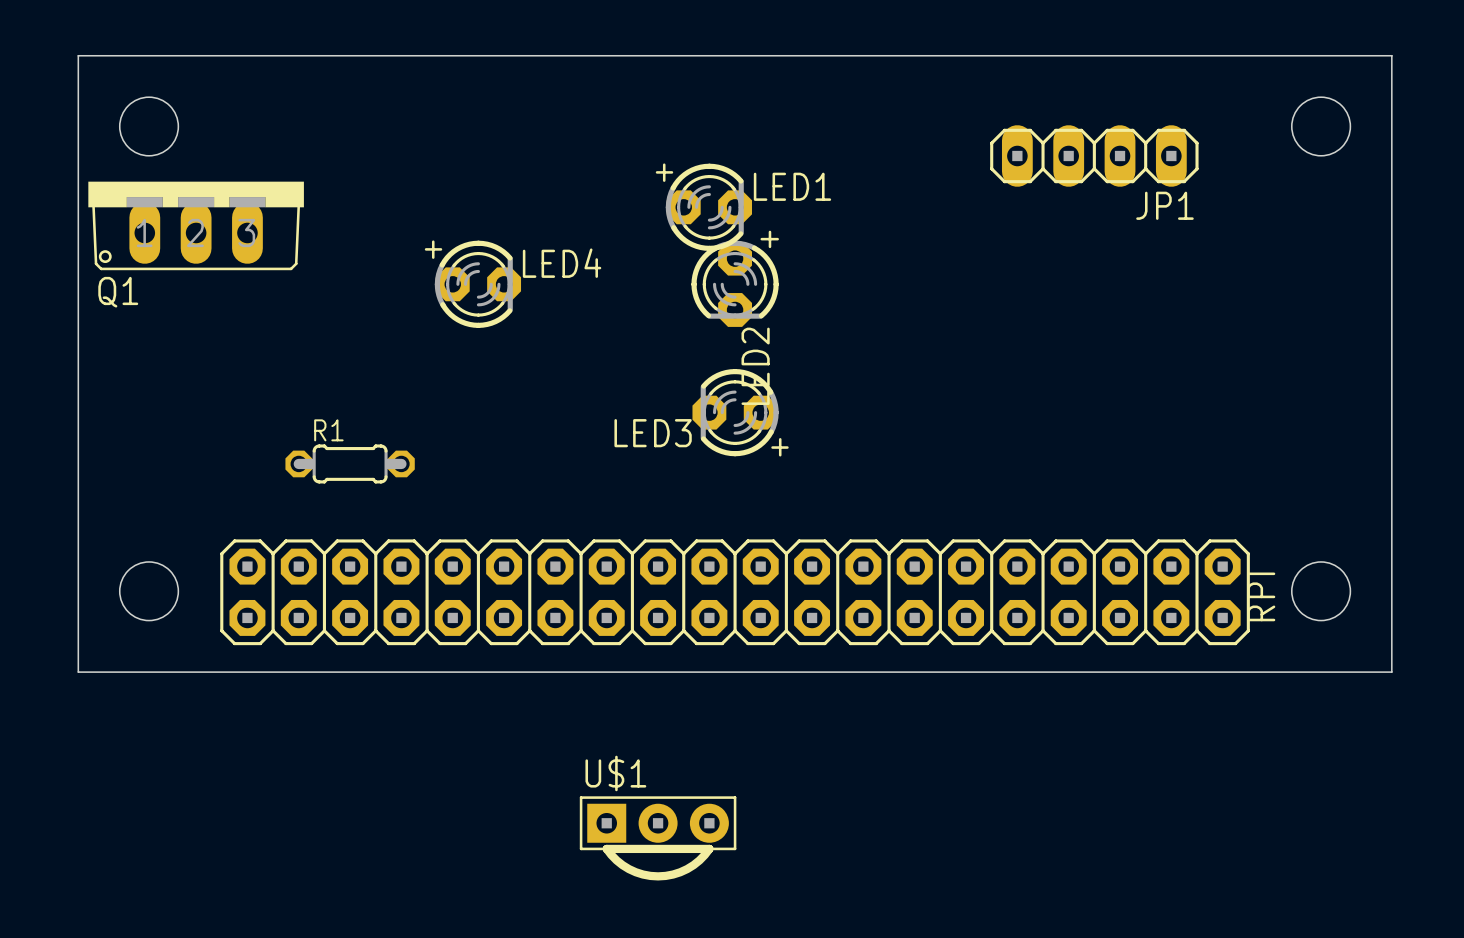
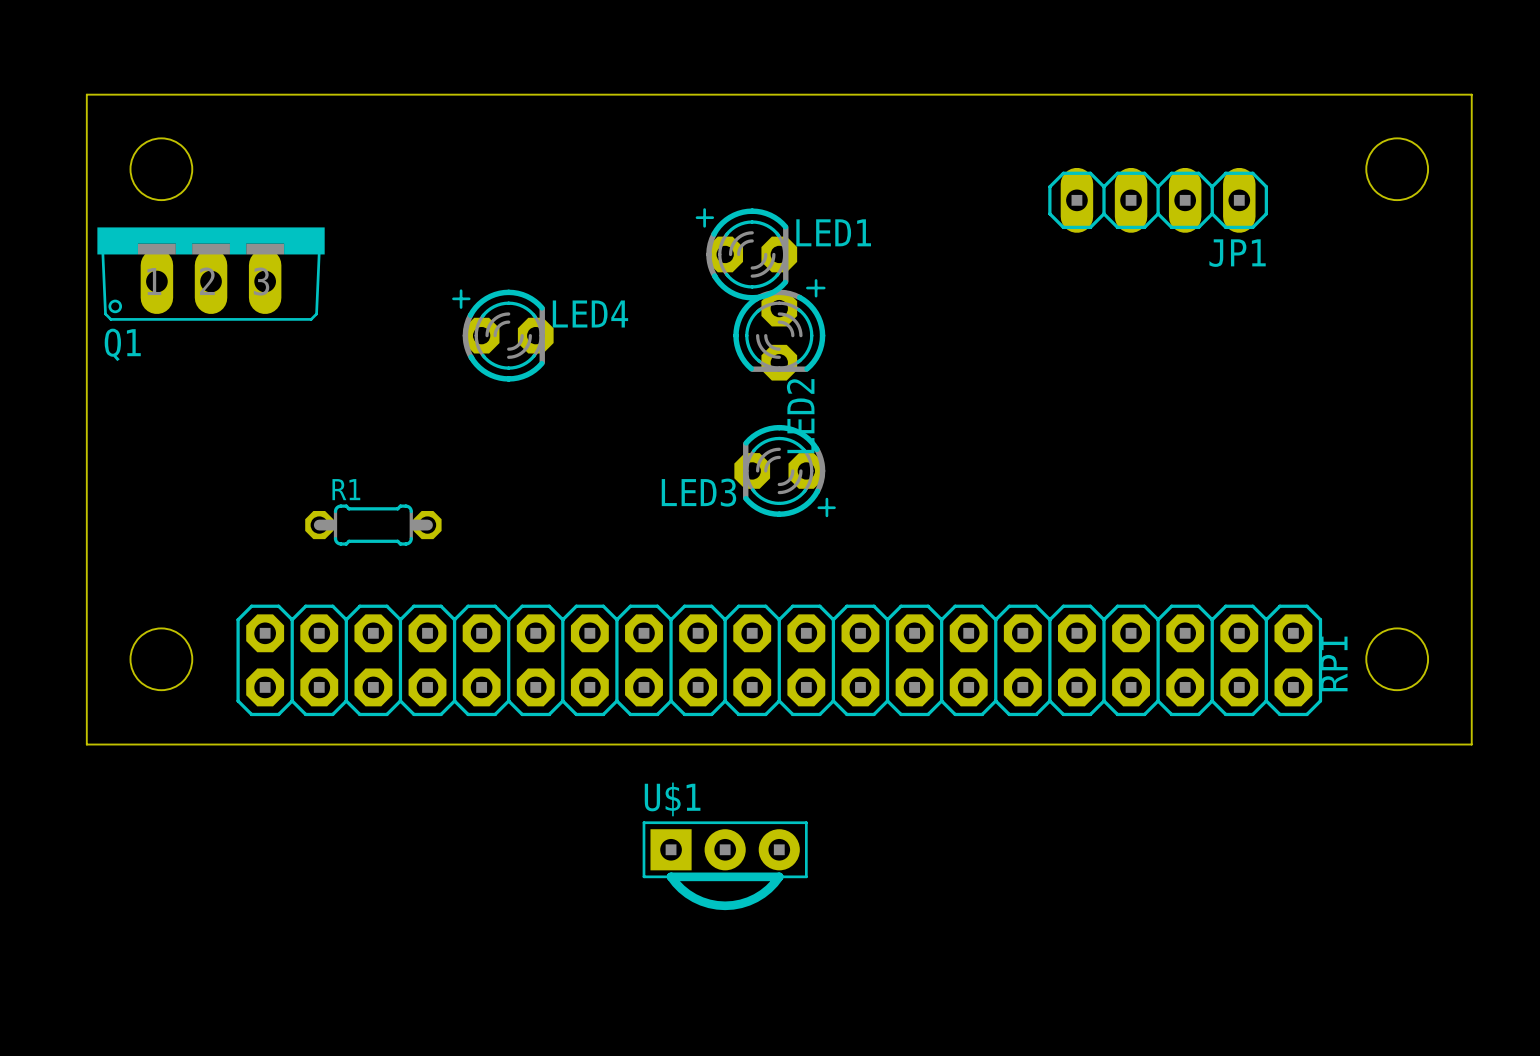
U$1 position: (658, 838) -> (725, 865)

